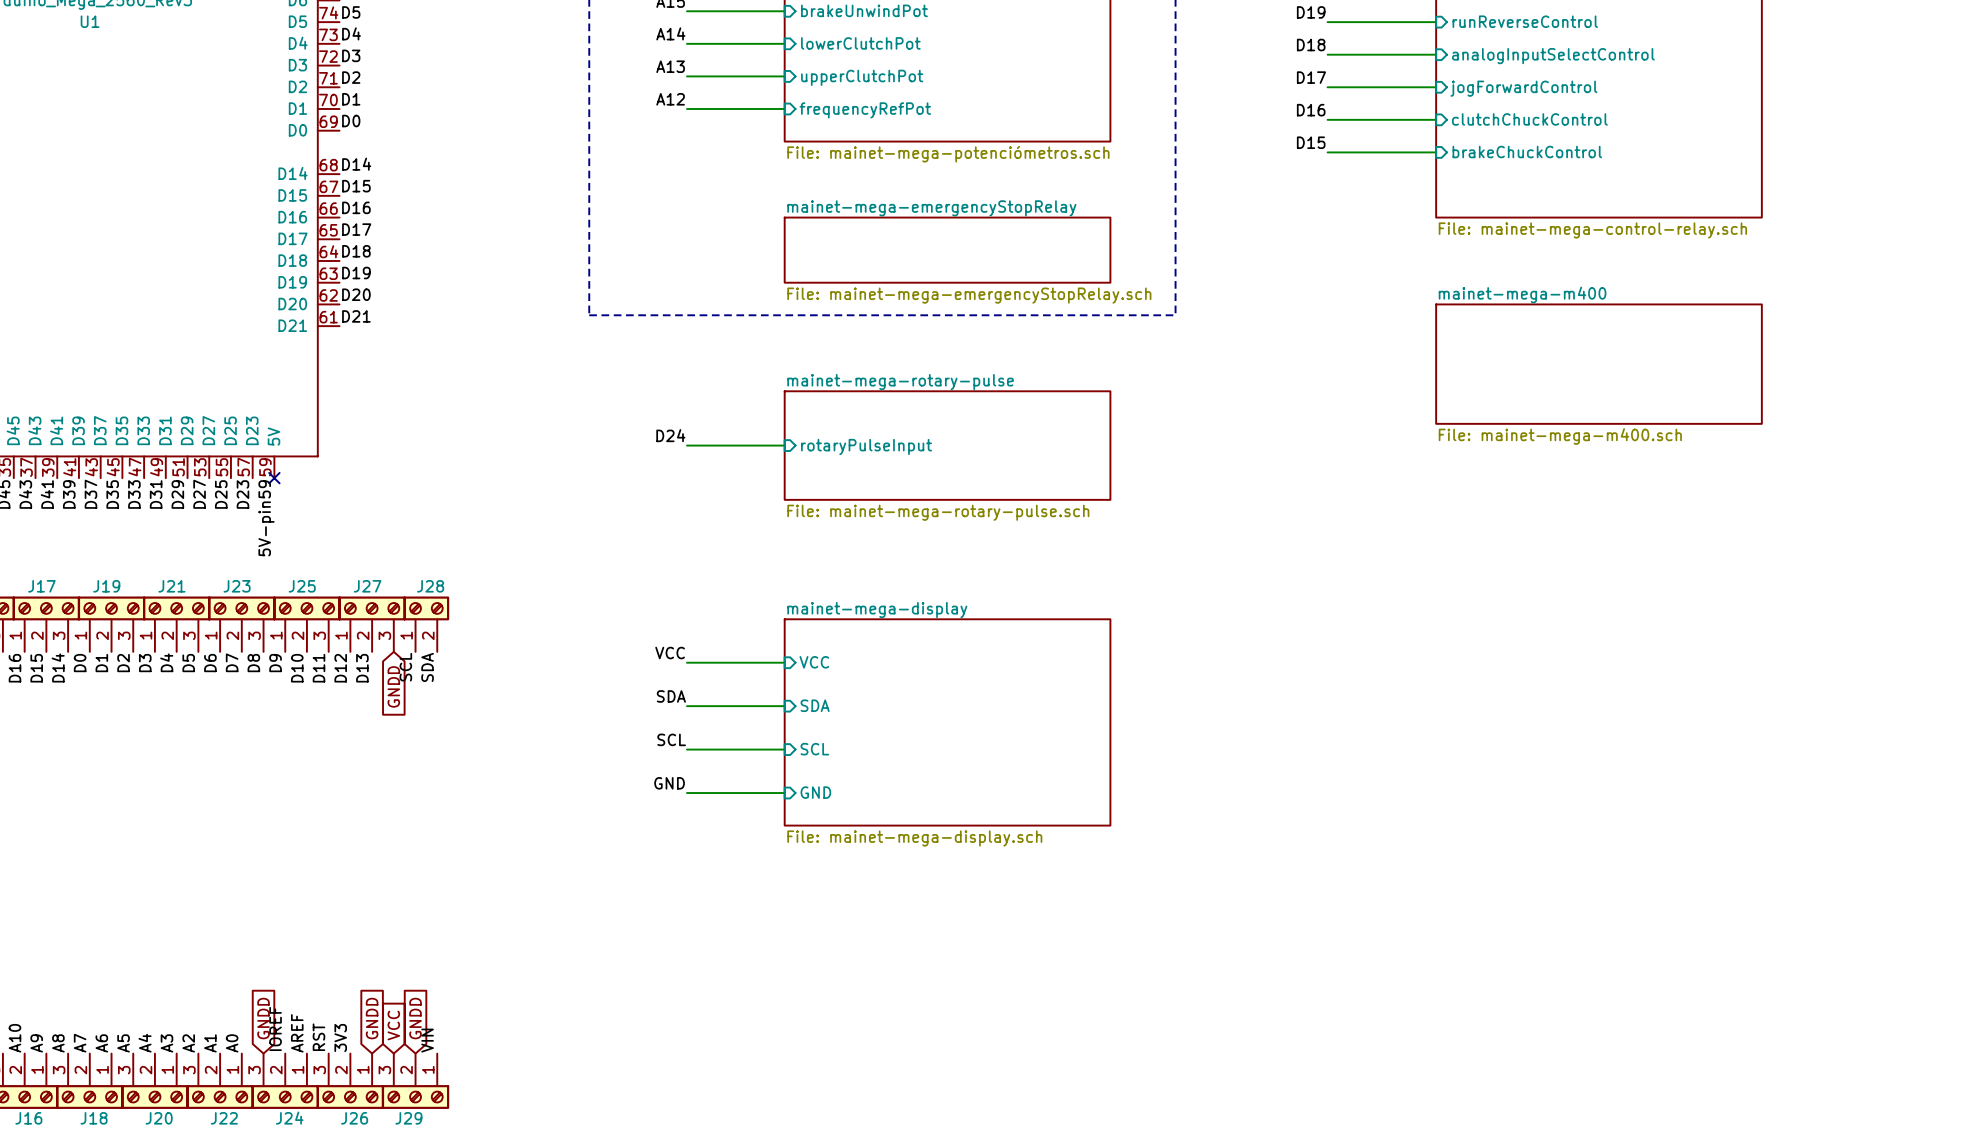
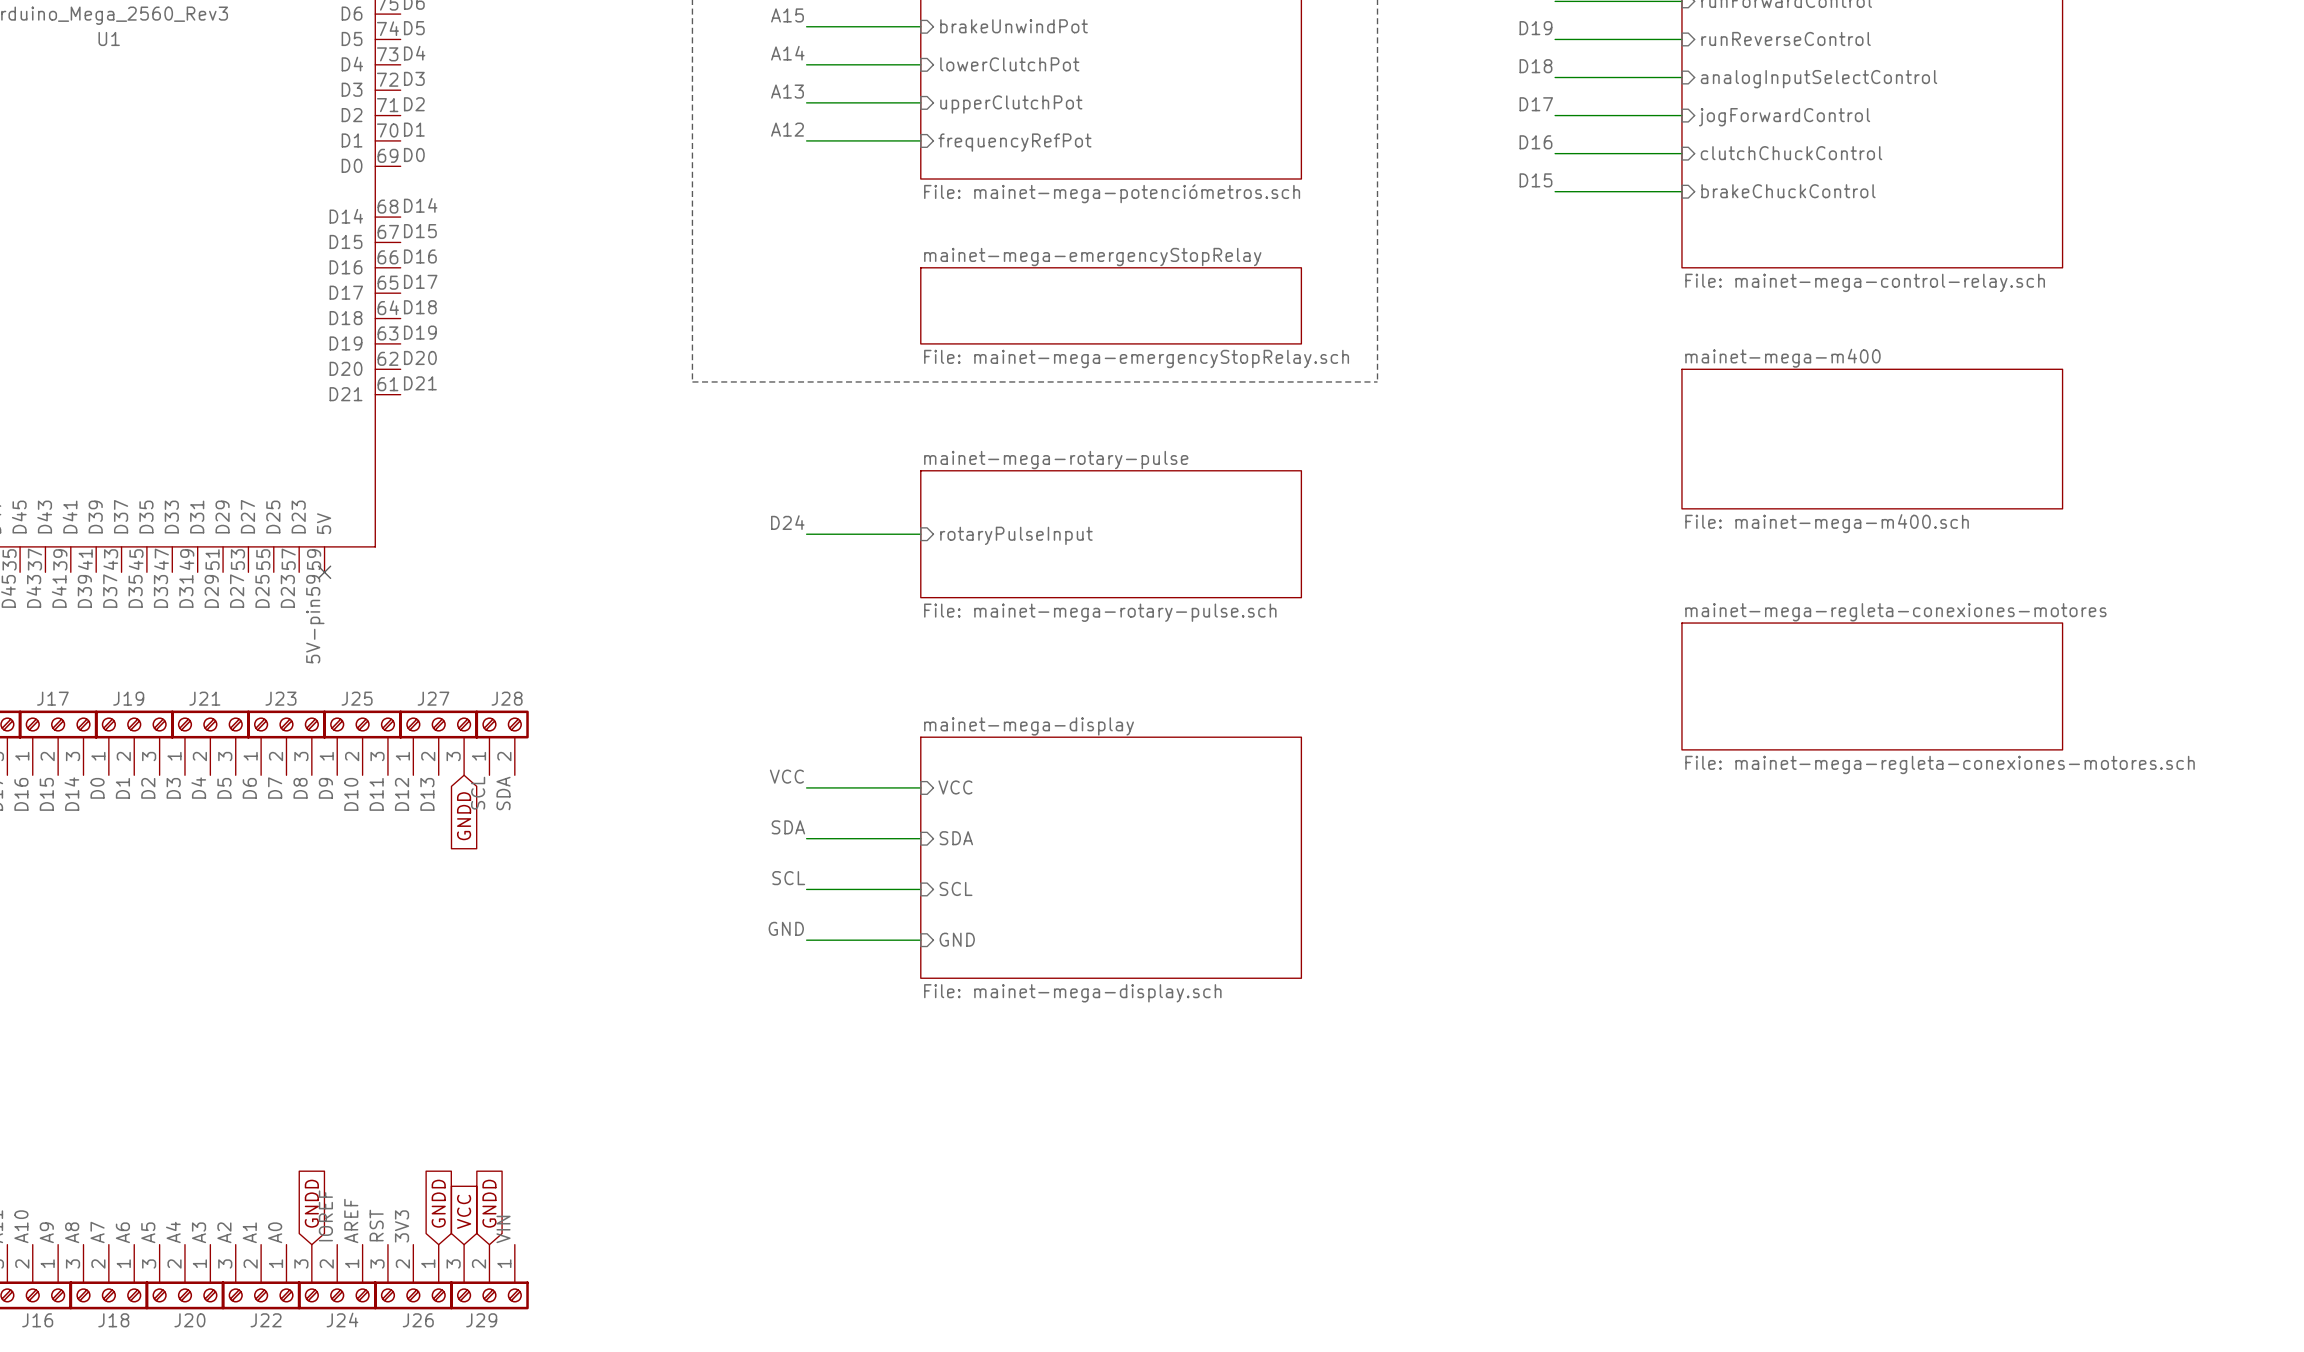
sheet mainet-mega-regleta-conexiones-motores: none -> File: mainet-mega-regleta-conexiones-motores.sch (1872, 686)

